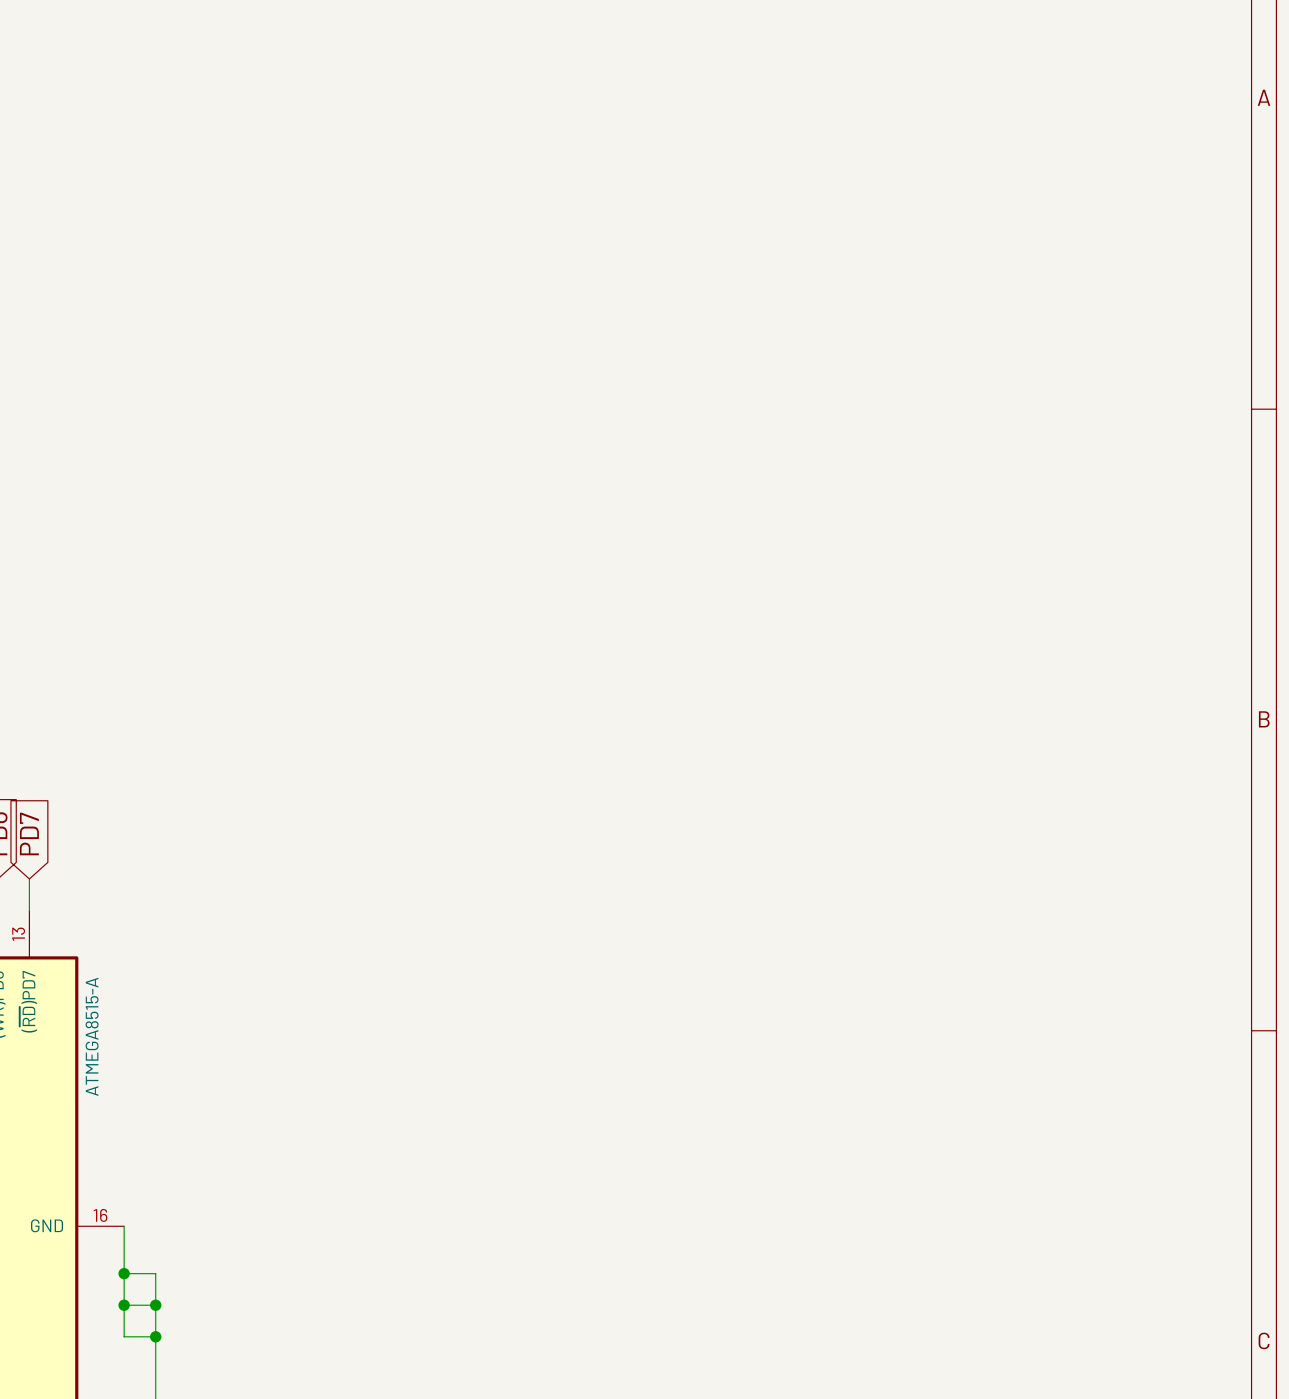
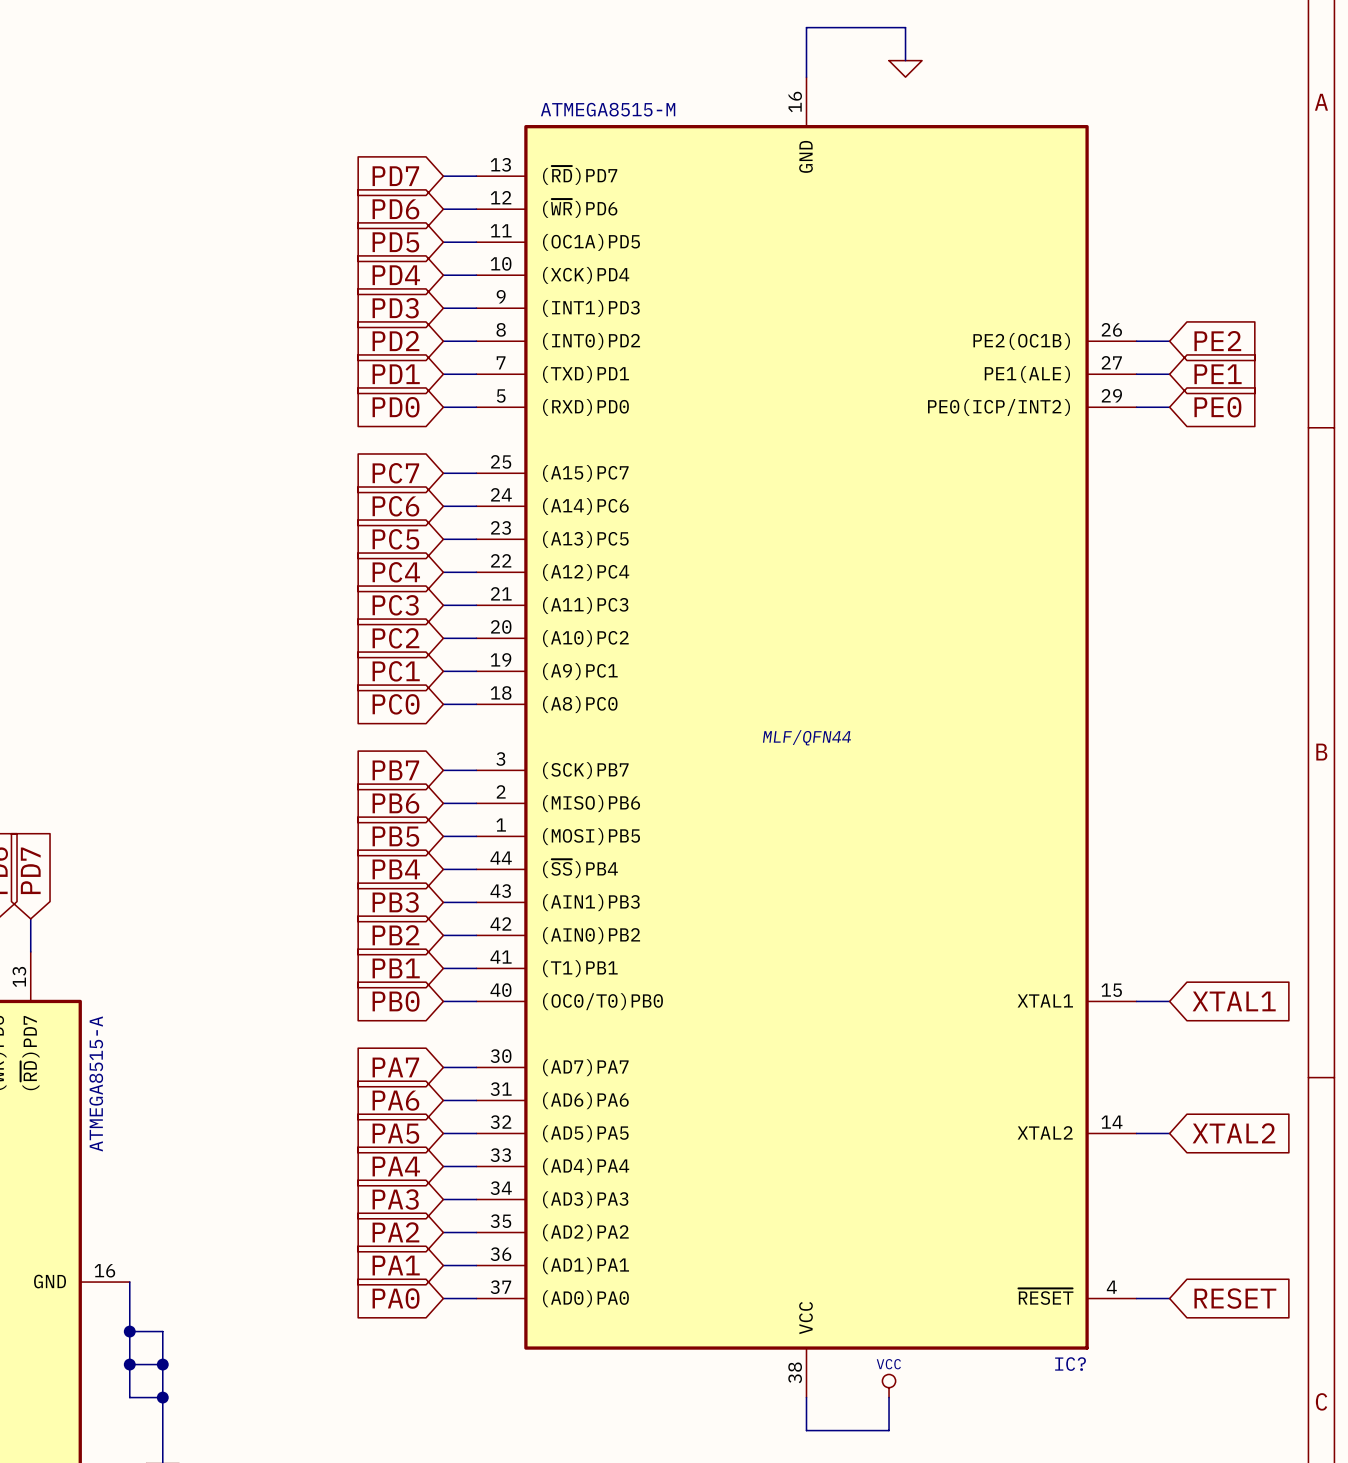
wire: none -> (905, 60) (905, 27) (806, 27) (806, 77)
power symbol: none -> (905, 68)
global label: none -> PD7 (395, 176)
wire: none -> (443, 176) (476, 176)
global label: none -> PD6 (395, 209)
wire: none -> (443, 209) (476, 209)
global label: none -> PD5 (395, 242)
wire: none -> (443, 242) (476, 242)
global label: none -> PD4 (396, 275)
wire: none -> (443, 275) (476, 275)
global label: none -> PD3 (395, 308)
wire: none -> (443, 308) (476, 308)
global label: none -> PD2 (395, 341)
wire: none -> (443, 341) (476, 341)
wire: none -> (1136, 341) (1169, 341)
global label: none -> PE2 (1217, 341)
global label: none -> PD1 (396, 374)
wire: none -> (443, 374) (476, 374)
wire: none -> (1136, 374) (1169, 374)
global label: none -> PE1 (1218, 374)
global label: none -> PD0 (396, 407)
wire: none -> (443, 407) (476, 407)
wire: none -> (1136, 407) (1169, 407)
global label: none -> PE0 (1217, 407)
global label: none -> PC7 (395, 473)
wire: none -> (443, 473) (476, 473)
global label: none -> PC6 (395, 506)
wire: none -> (443, 506) (476, 506)
global label: none -> PC5 (395, 539)
wire: none -> (443, 539) (476, 539)
global label: none -> PC4 (396, 572)
wire: none -> (443, 572) (476, 572)
wire: none -> (443, 605) (476, 605)
global label: none -> PC3 (395, 605)
global label: none -> PC2 (395, 638)
wire: none -> (443, 638) (476, 638)
global label: none -> PC1 (396, 671)
wire: none -> (443, 671) (476, 671)
global label: none -> PC0 (396, 704)
wire: none -> (443, 704) (476, 704)
IC?: none -> ATMEGA8515-M (806, 737)
global label: none -> PB7 (395, 770)
wire: none -> (443, 770) (476, 770)
global label: none -> PB6 (395, 803)
wire: none -> (443, 803) (476, 803)
global label: none -> PB5 (395, 836)
wire: none -> (443, 836) (476, 836)
global label: none -> PB4 (396, 869)
wire: none -> (443, 869) (476, 869)
global label: none -> PB3 (395, 902)
wire: none -> (443, 902) (476, 902)
global label: none -> PB2 (395, 935)
wire: none -> (443, 935) (476, 935)
global label: none -> PB1 (396, 968)
wire: none -> (443, 968) (476, 968)
global label: none -> PB0 (396, 1001)
wire: none -> (443, 1001) (476, 1001)
wire: none -> (1136, 1001) (1169, 1001)
global label: none -> XTAL1 (1234, 1001)
global label: none -> PA7 (395, 1067)
wire: none -> (443, 1067) (476, 1067)
global label: none -> PA6 (395, 1100)
wire: none -> (443, 1100) (476, 1100)
global label: none -> PA5 (395, 1133)
wire: none -> (443, 1133) (476, 1133)
wire: none -> (1136, 1133) (1169, 1133)
global label: none -> XTAL2 (1233, 1133)
global label: none -> PA4 (396, 1166)
wire: none -> (443, 1166) (476, 1166)
global label: none -> PA3 (395, 1199)
wire: none -> (443, 1199) (476, 1199)
global label: none -> PA2 (395, 1232)
wire: none -> (443, 1232) (476, 1232)
global label: none -> PA1 (396, 1265)
wire: none -> (443, 1265) (476, 1265)
global label: none -> PA0 (396, 1298)
wire: none -> (443, 1298) (476, 1298)
wire: none -> (1136, 1298) (1169, 1298)
global label: none -> RESET (1235, 1298)
power symbol: none -> VCC (889, 1386)
wire: none -> (806, 1397) (806, 1430) (889, 1430) (889, 1397)

